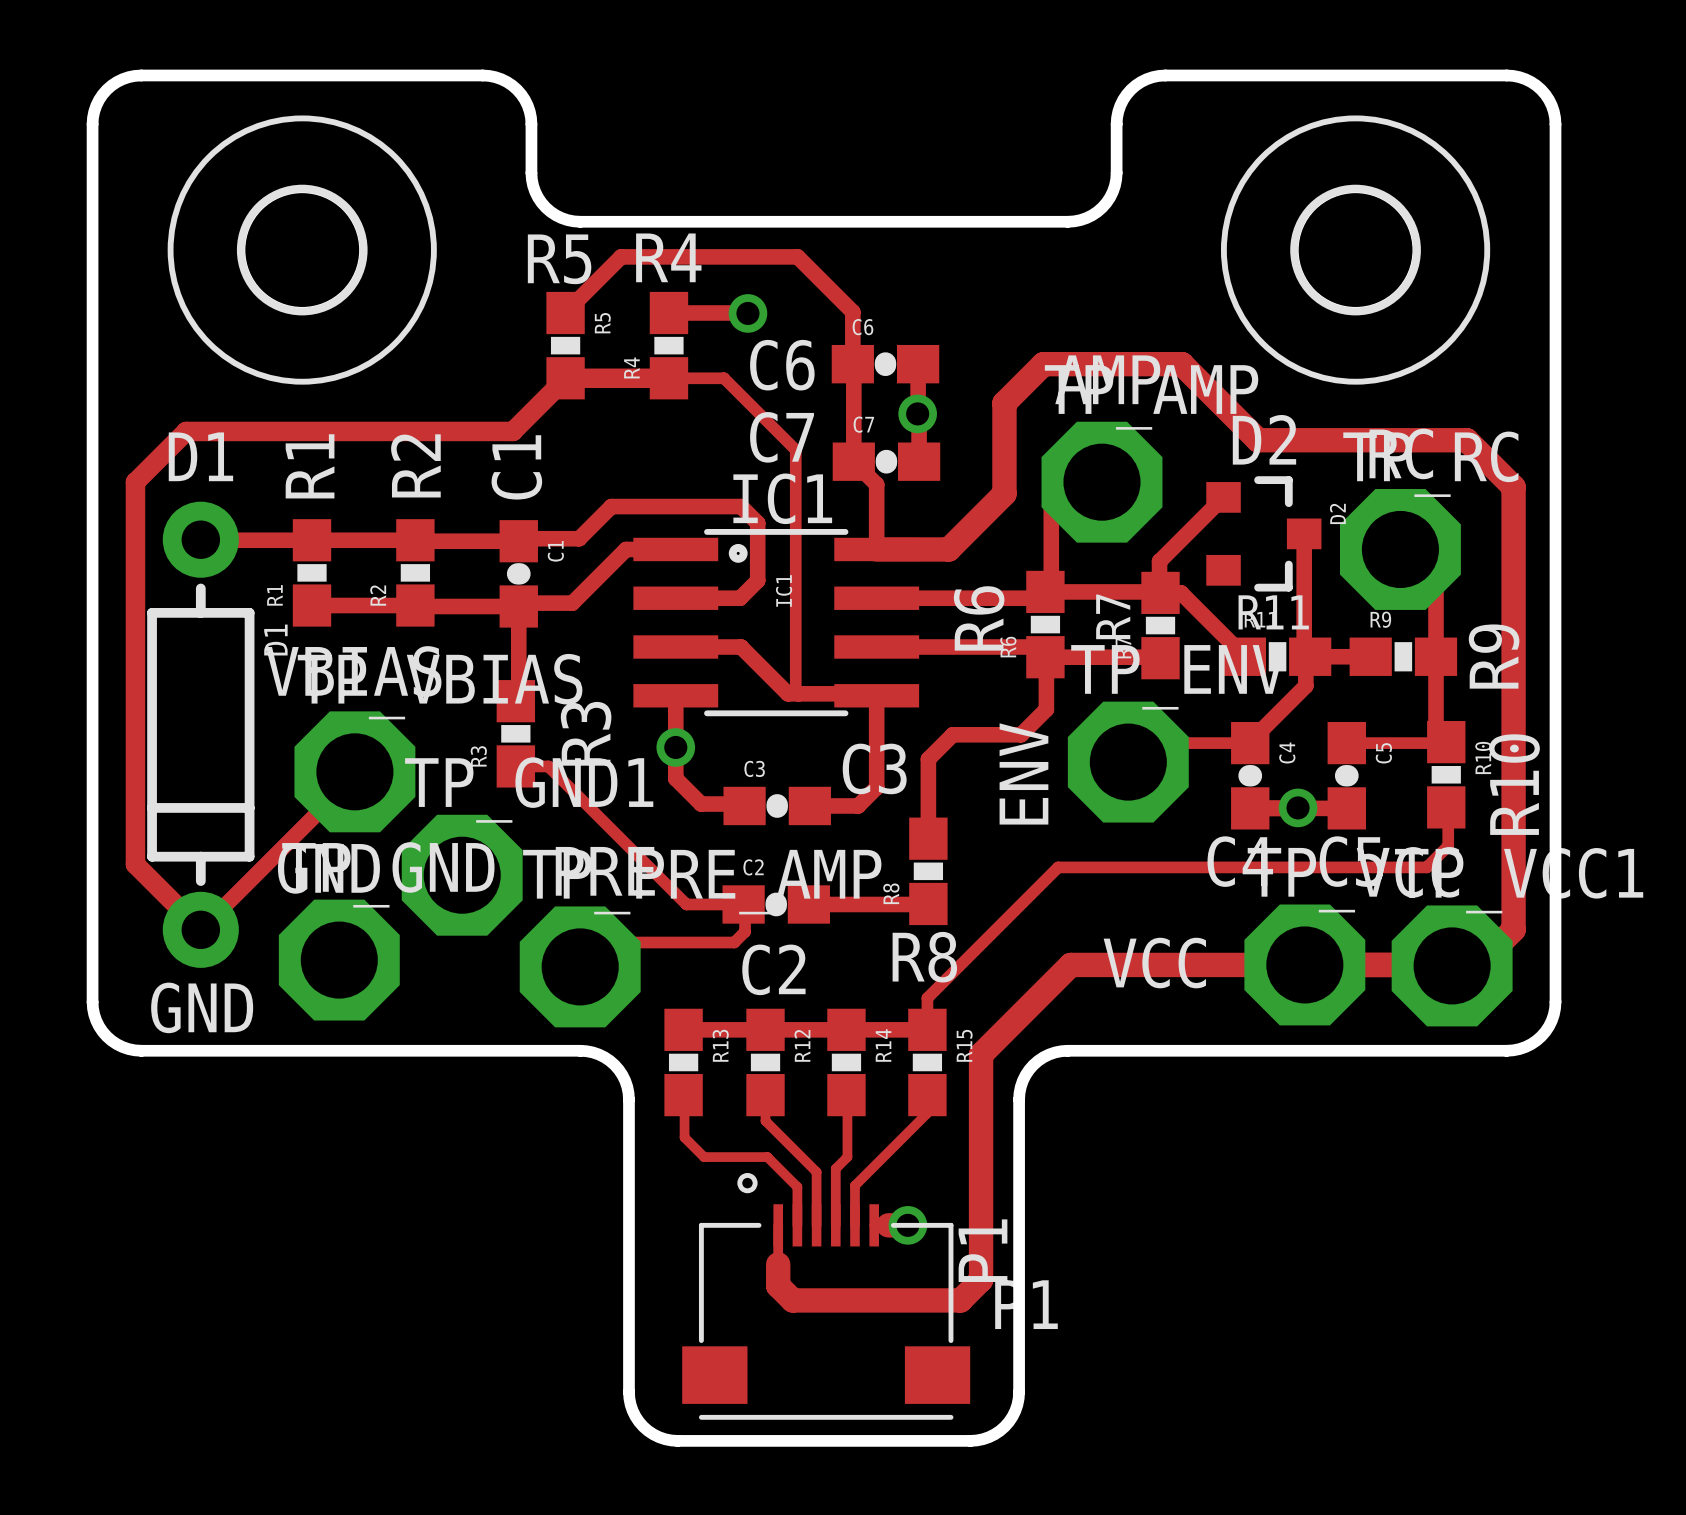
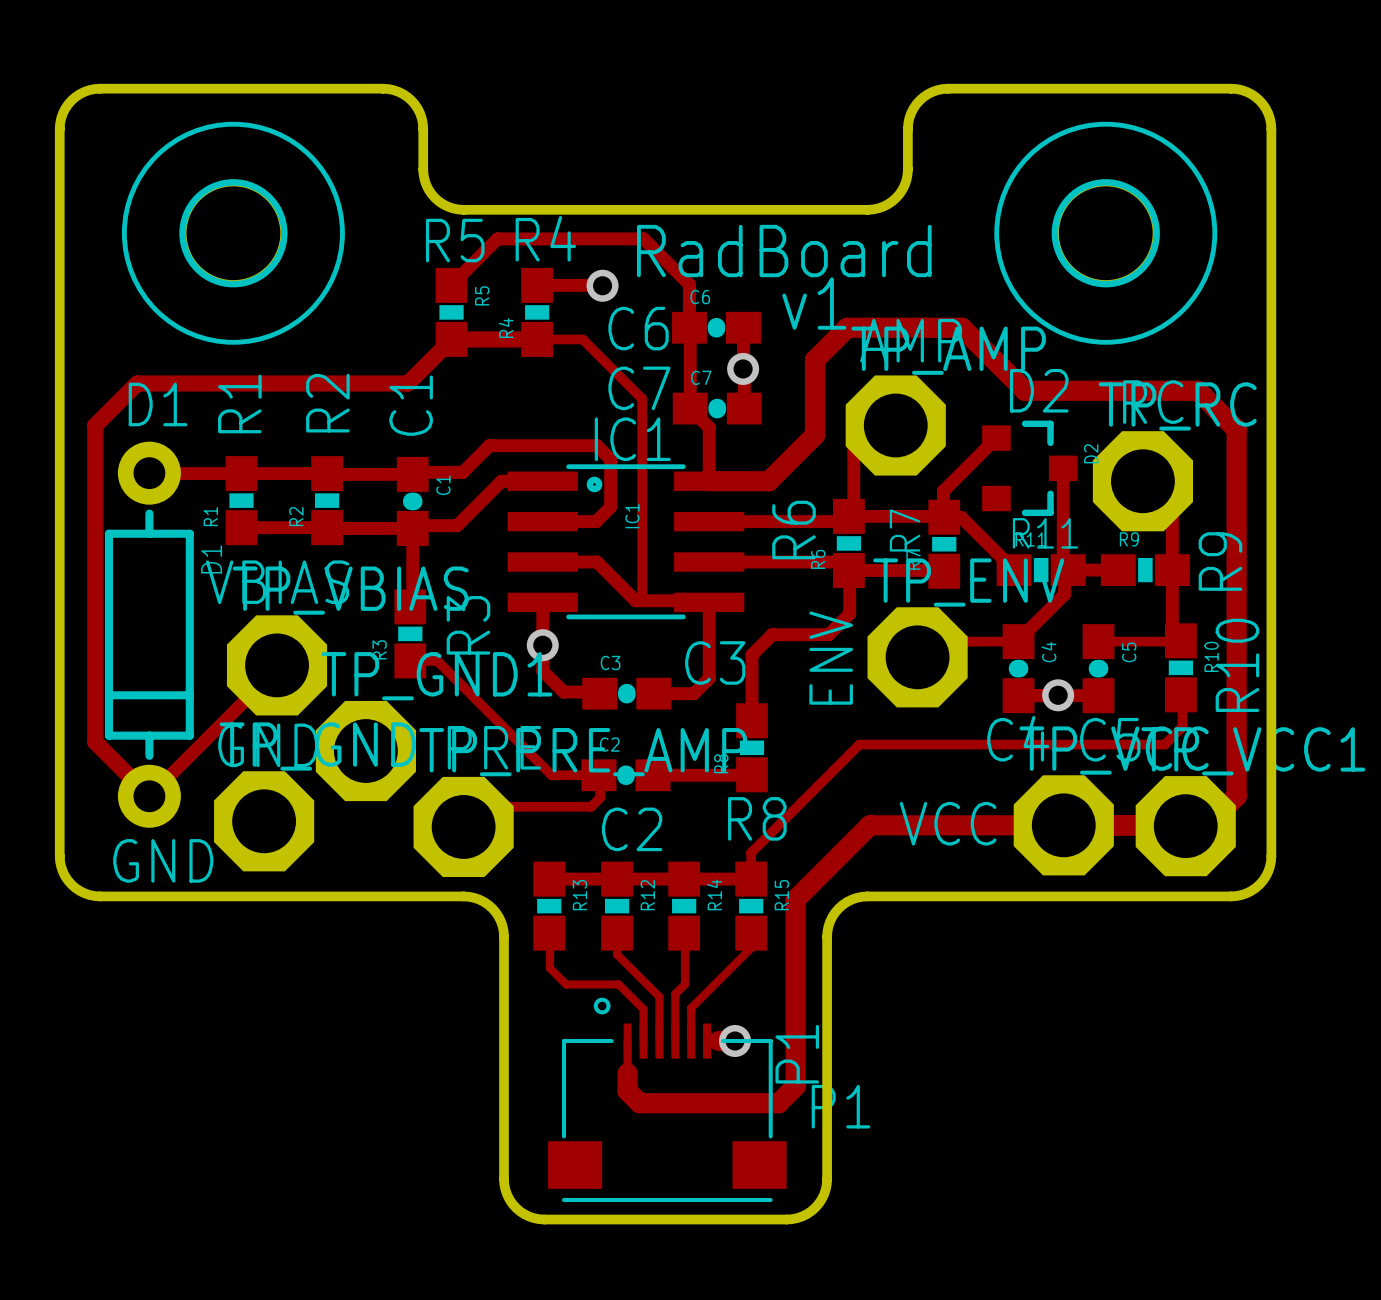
text: none -> RadBoard (784, 251)
text: none -> v1 (814, 303)

